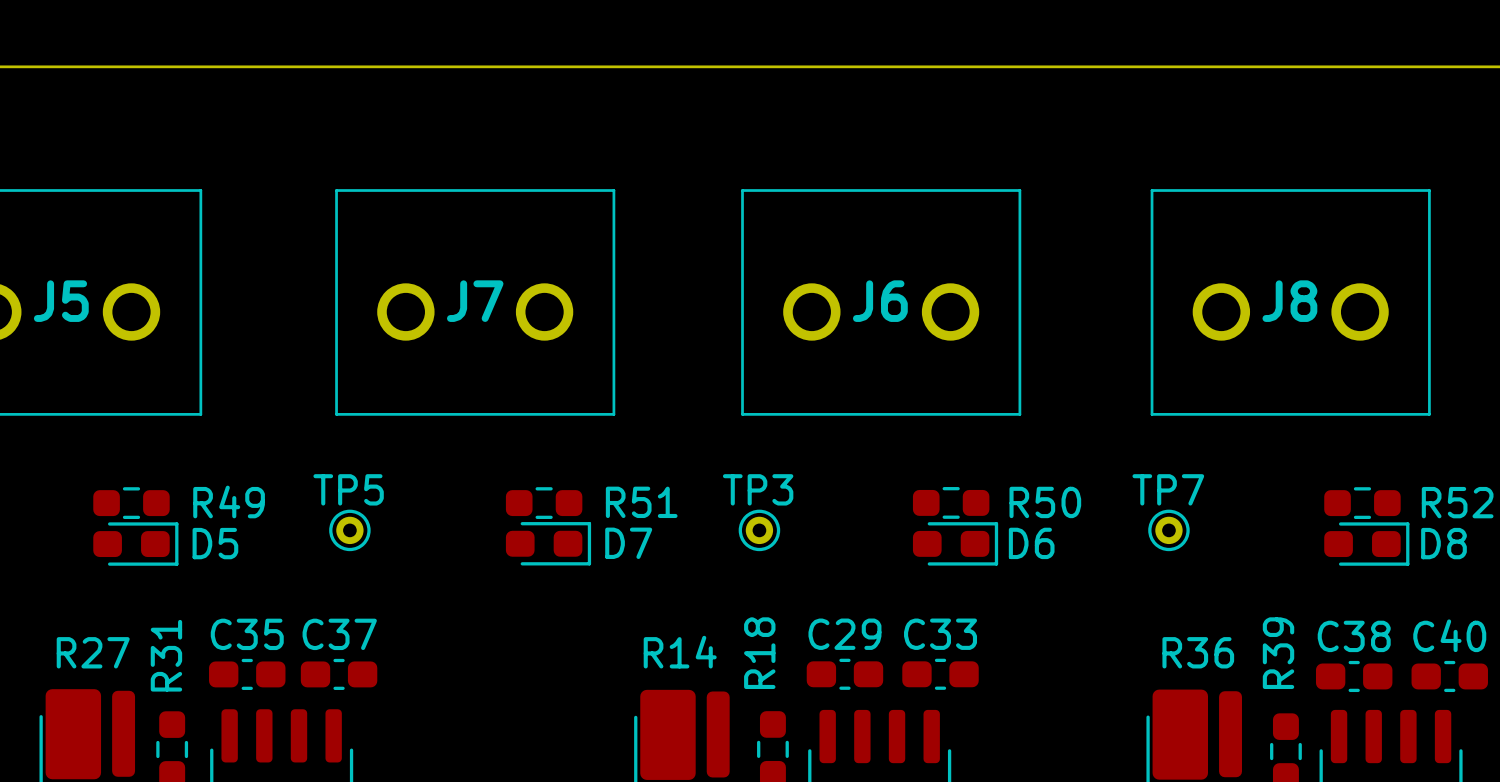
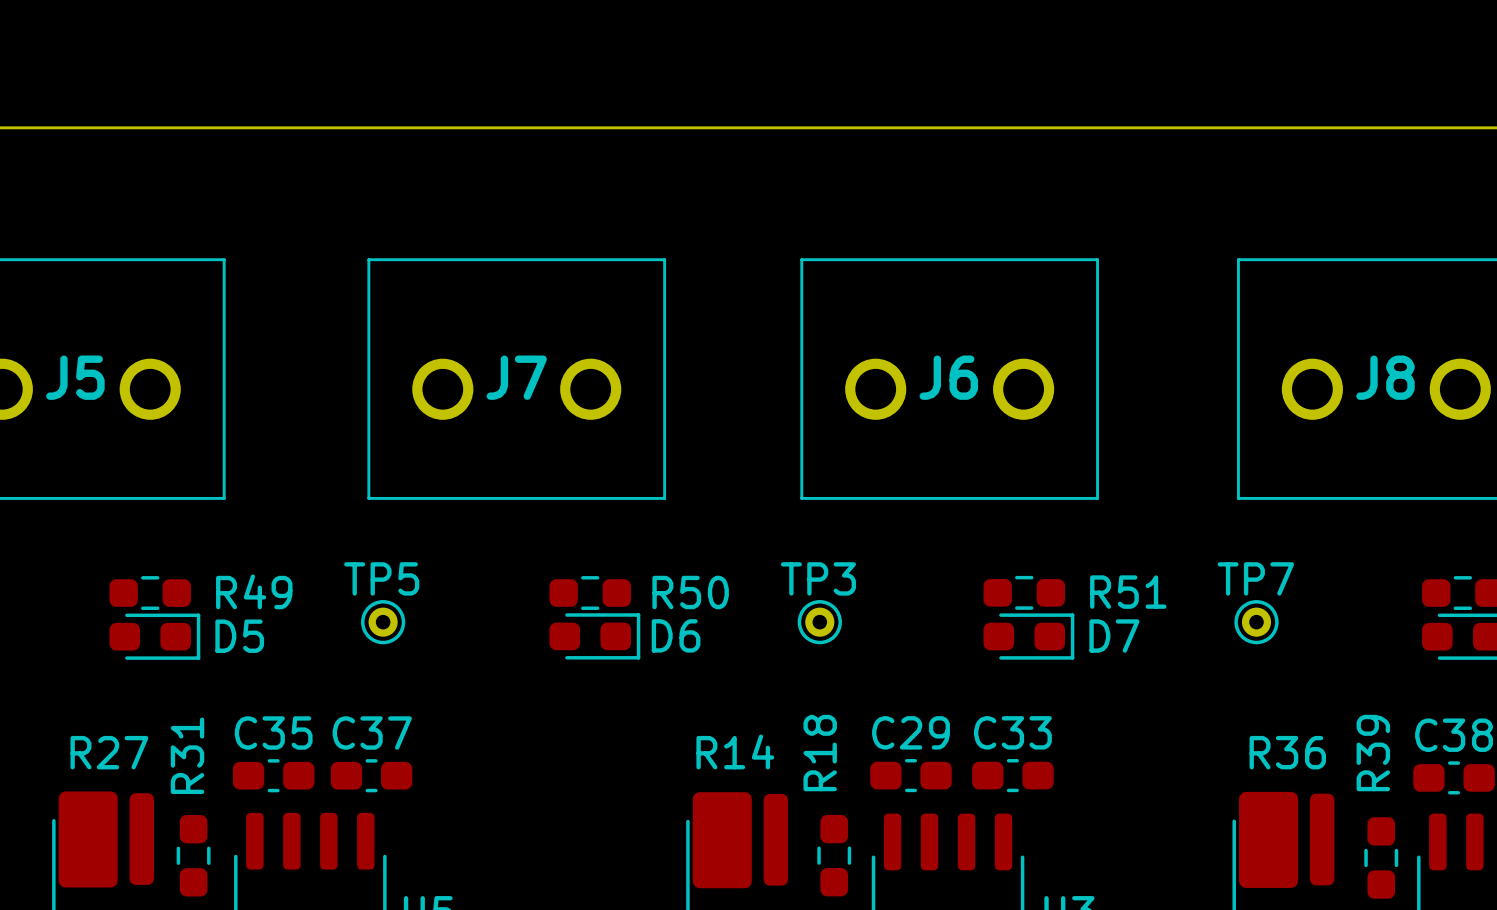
R51 name: R51 (641, 502) -> R50 (690, 592)
R50 name: R50 (1045, 502) -> R51 (1128, 592)
D7 name: D7 (628, 543) -> D6 (676, 635)
D6 name: D6 (1031, 543) -> D7 (1114, 636)

